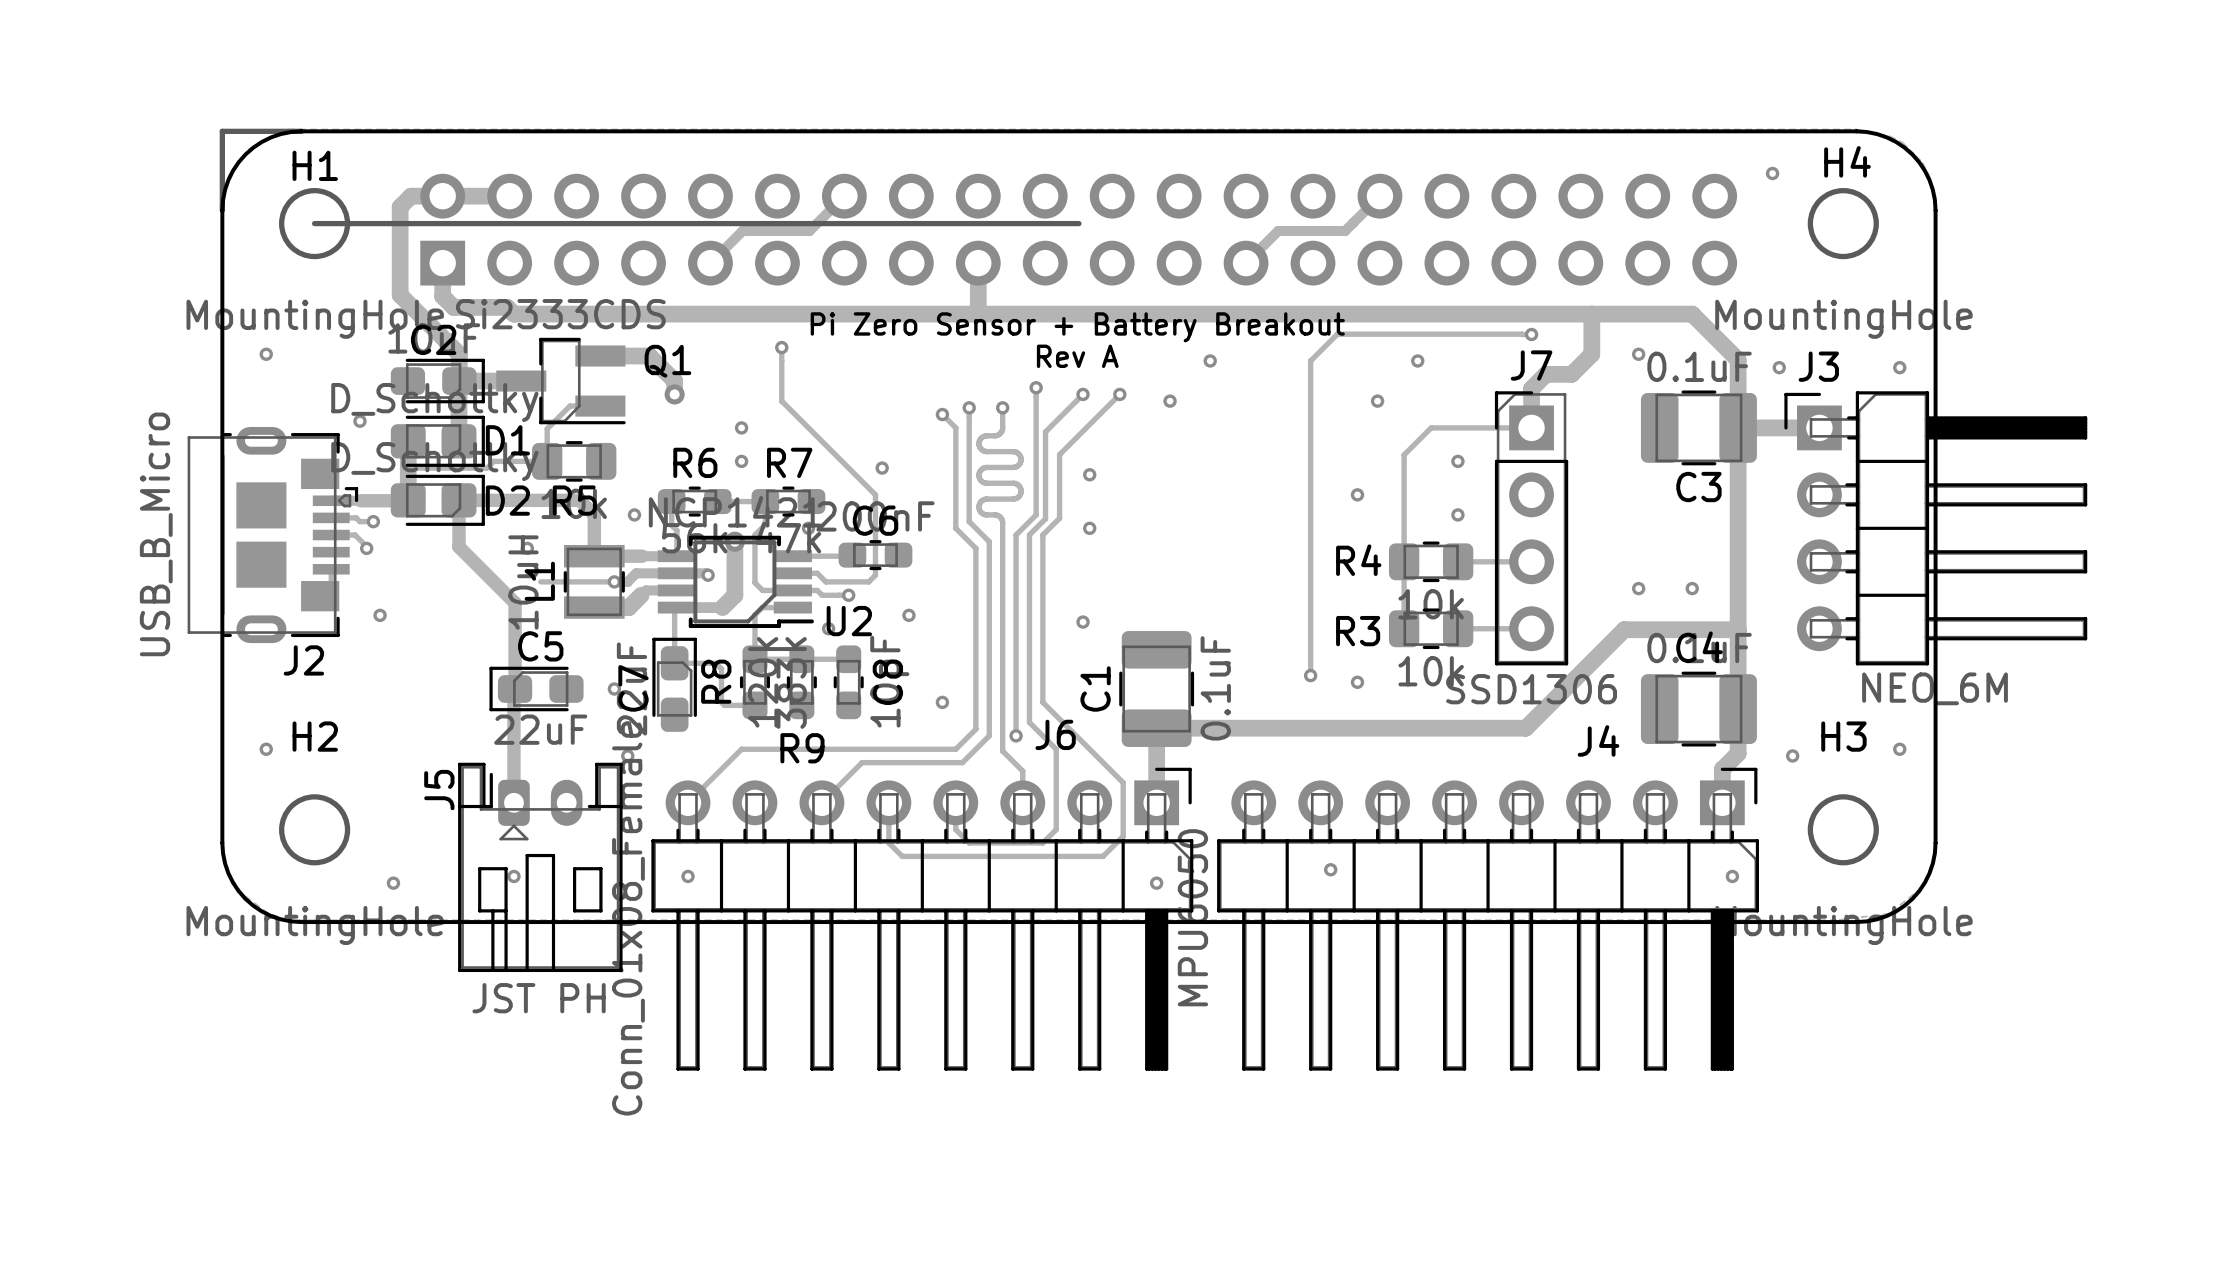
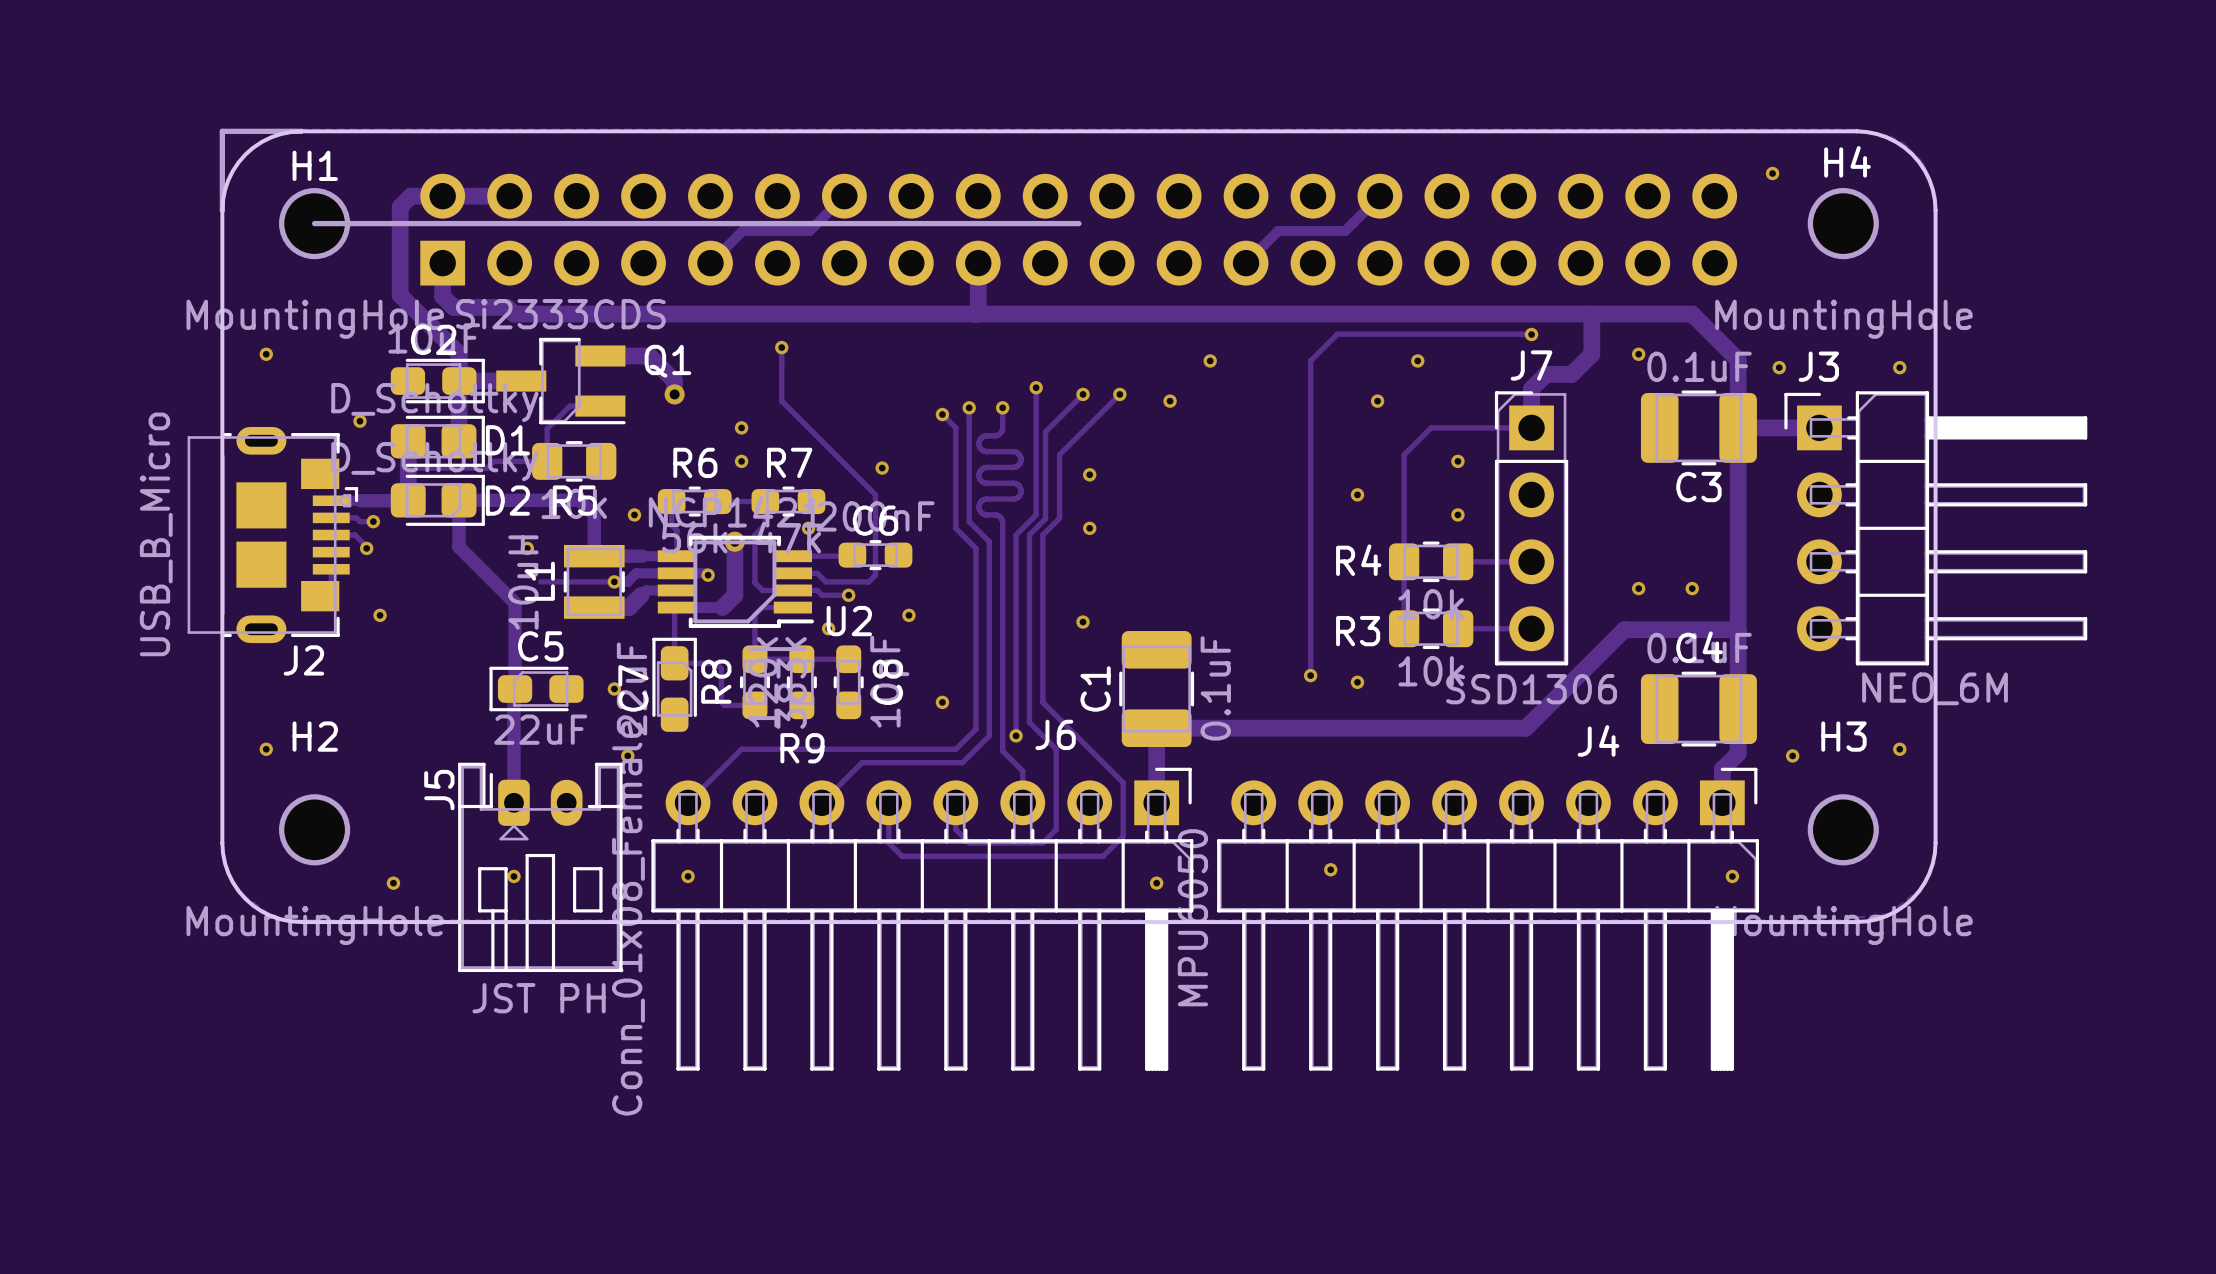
text: Pi Zero Sensor + Battery Breakout (1077, 327) -> none
text: Rev A (1077, 356) -> none

